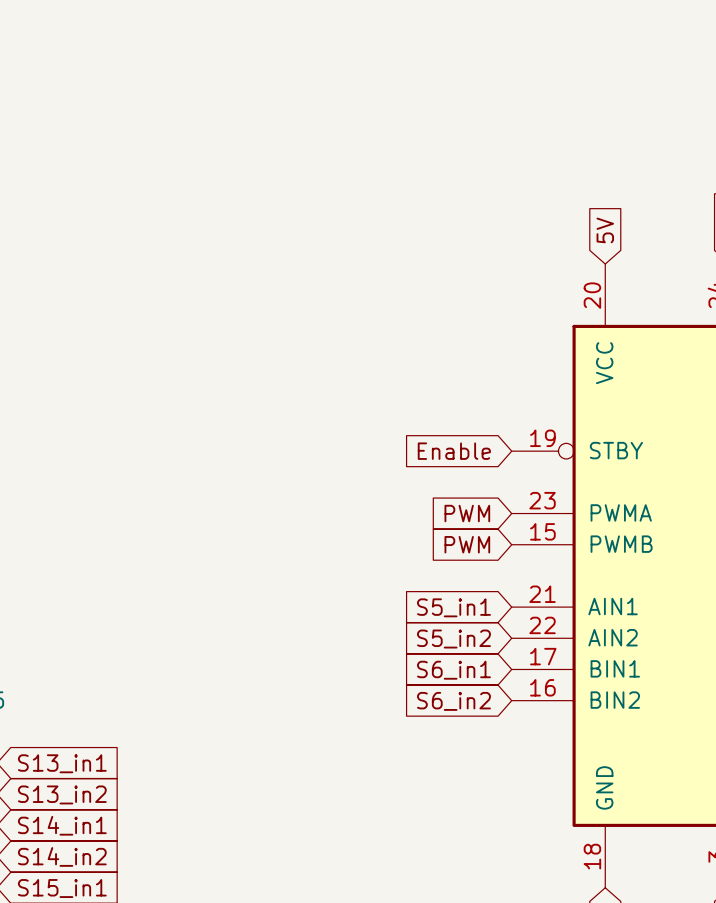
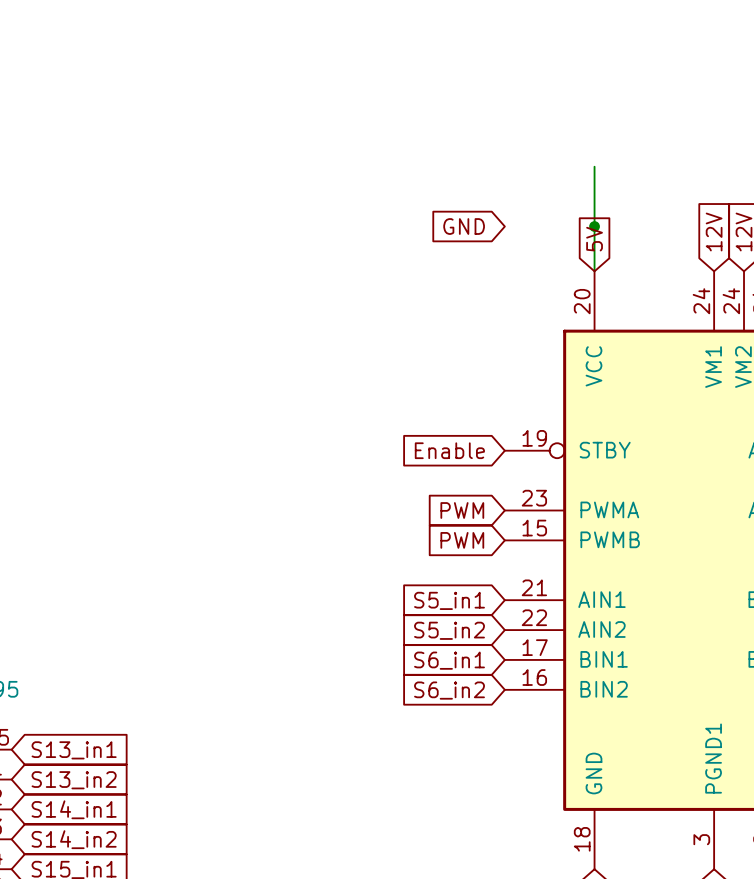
wire: none -> (594, 166) (594, 271)
global label: none -> GND (464, 226)
junction: none -> (594, 226)

